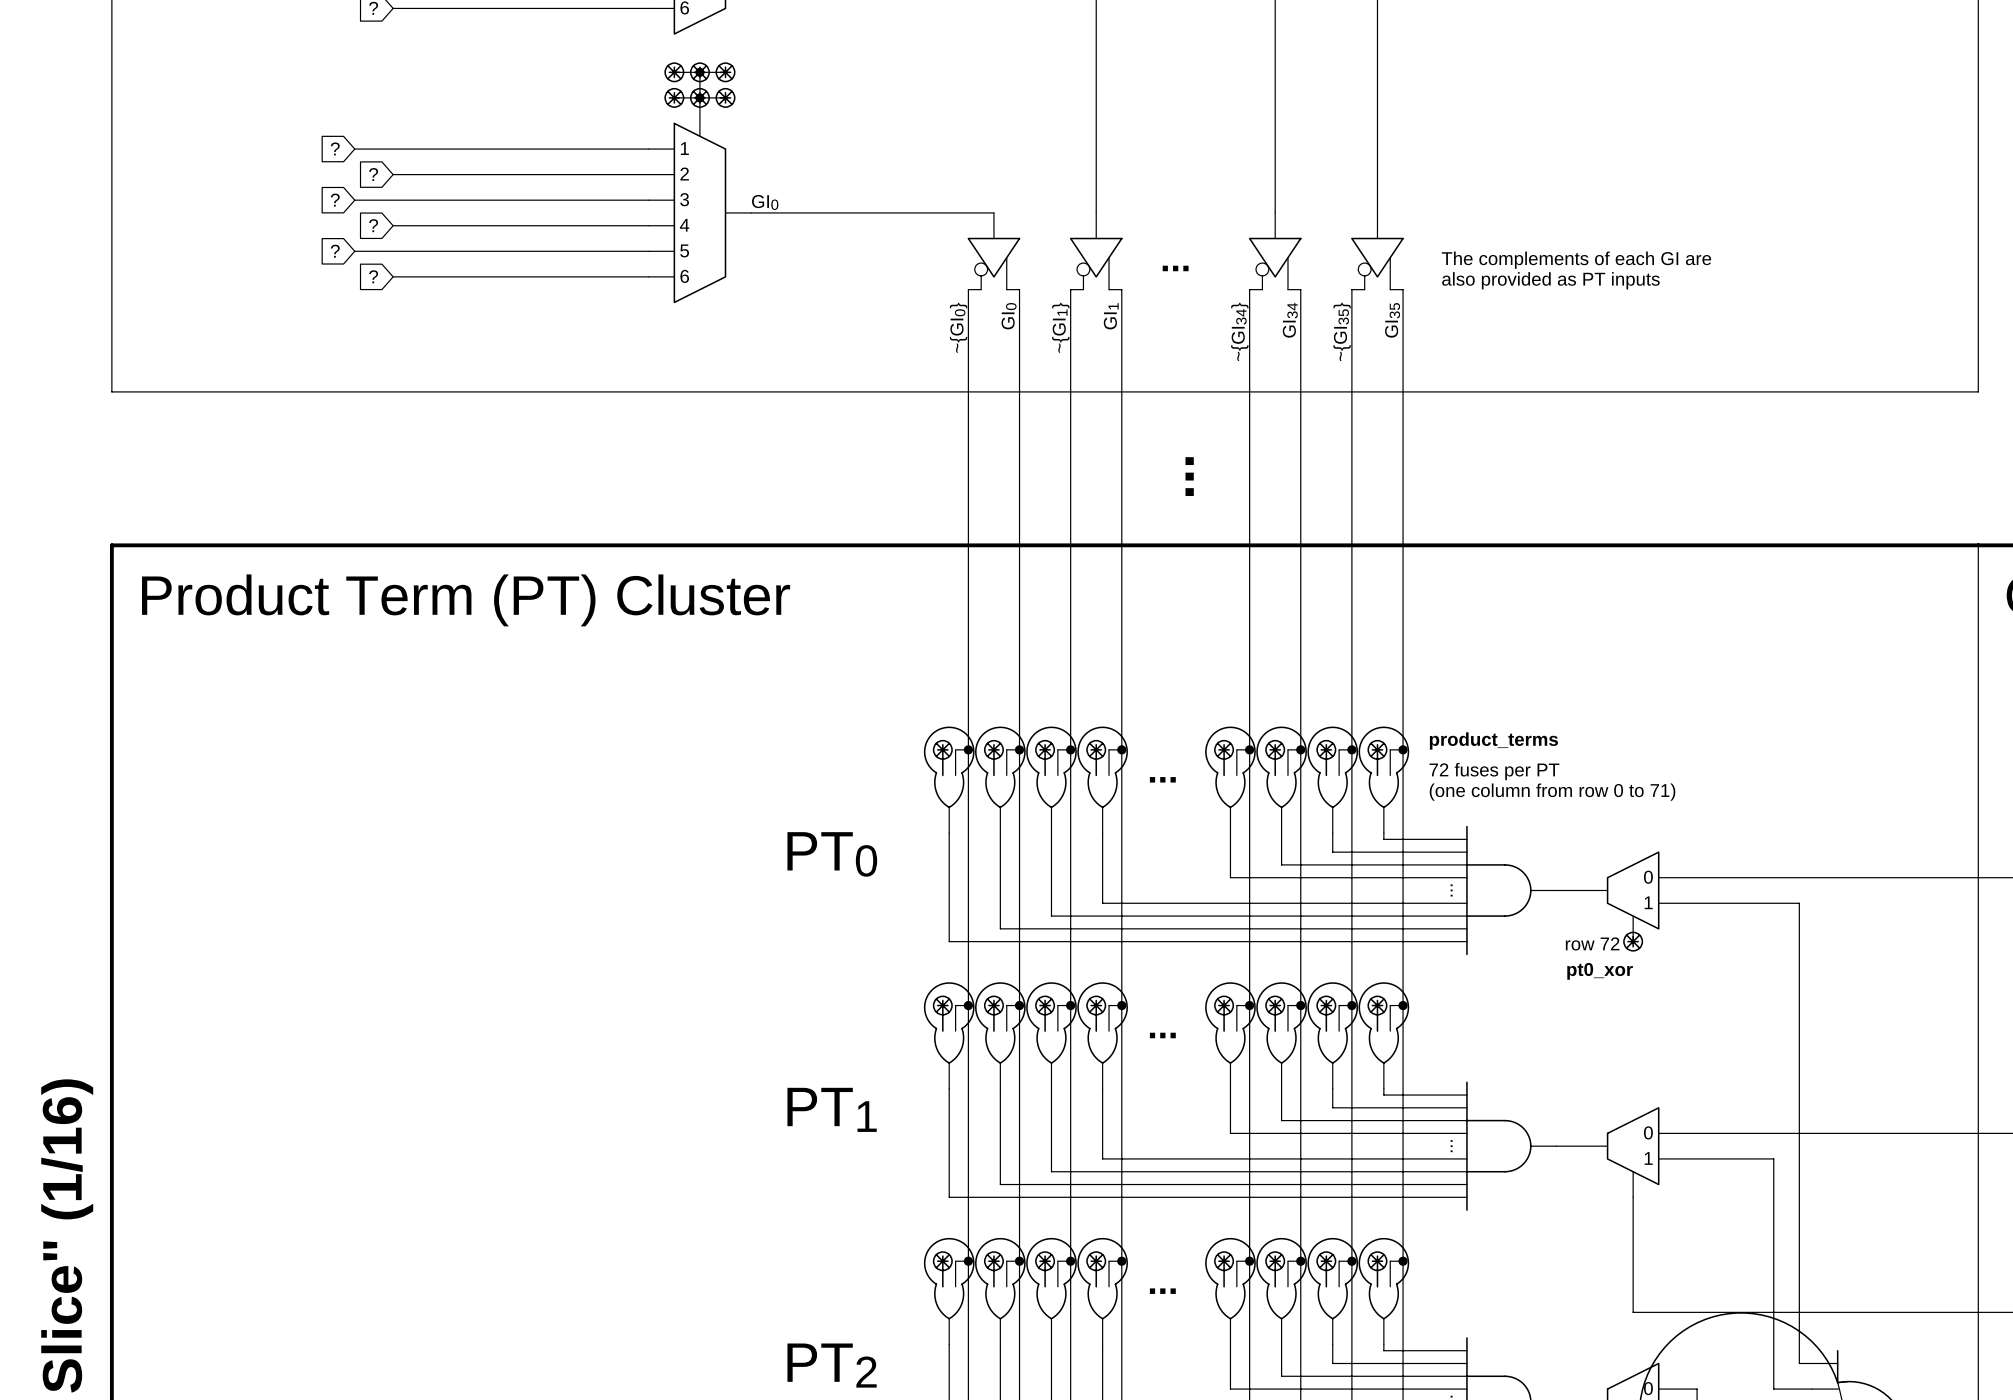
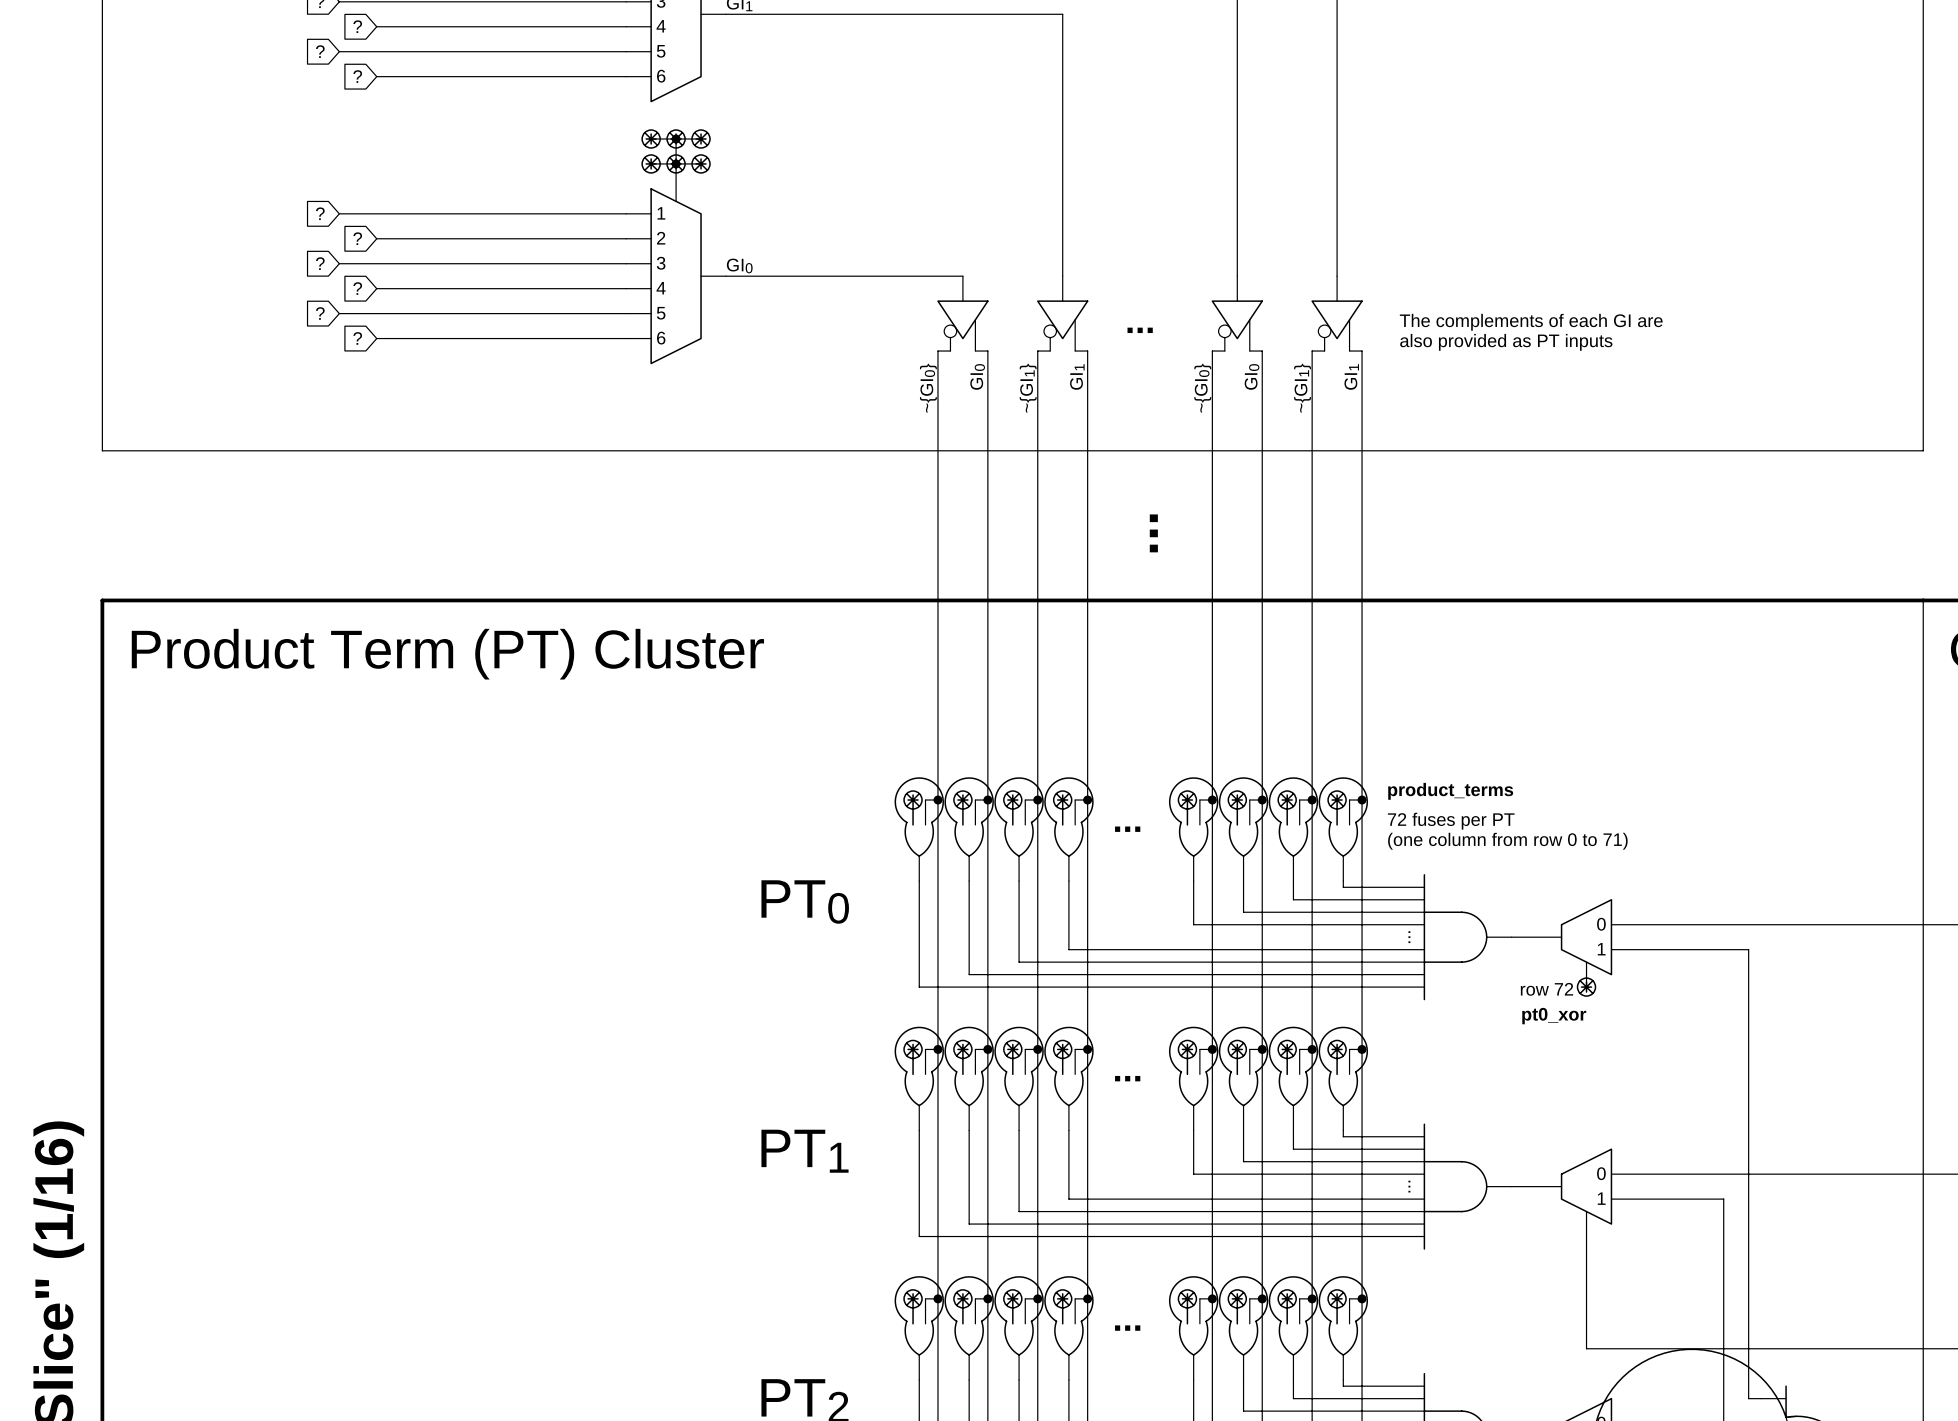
label: GI34 (1290, 320) -> GI0 (1252, 376)
label: GI35 (1392, 320) -> GI1 (1351, 376)
label: ~{GI34} (1239, 331) -> ~{GI0} (1202, 388)
label: ~{GI35} (1342, 331) -> ~{GI1} (1302, 388)

